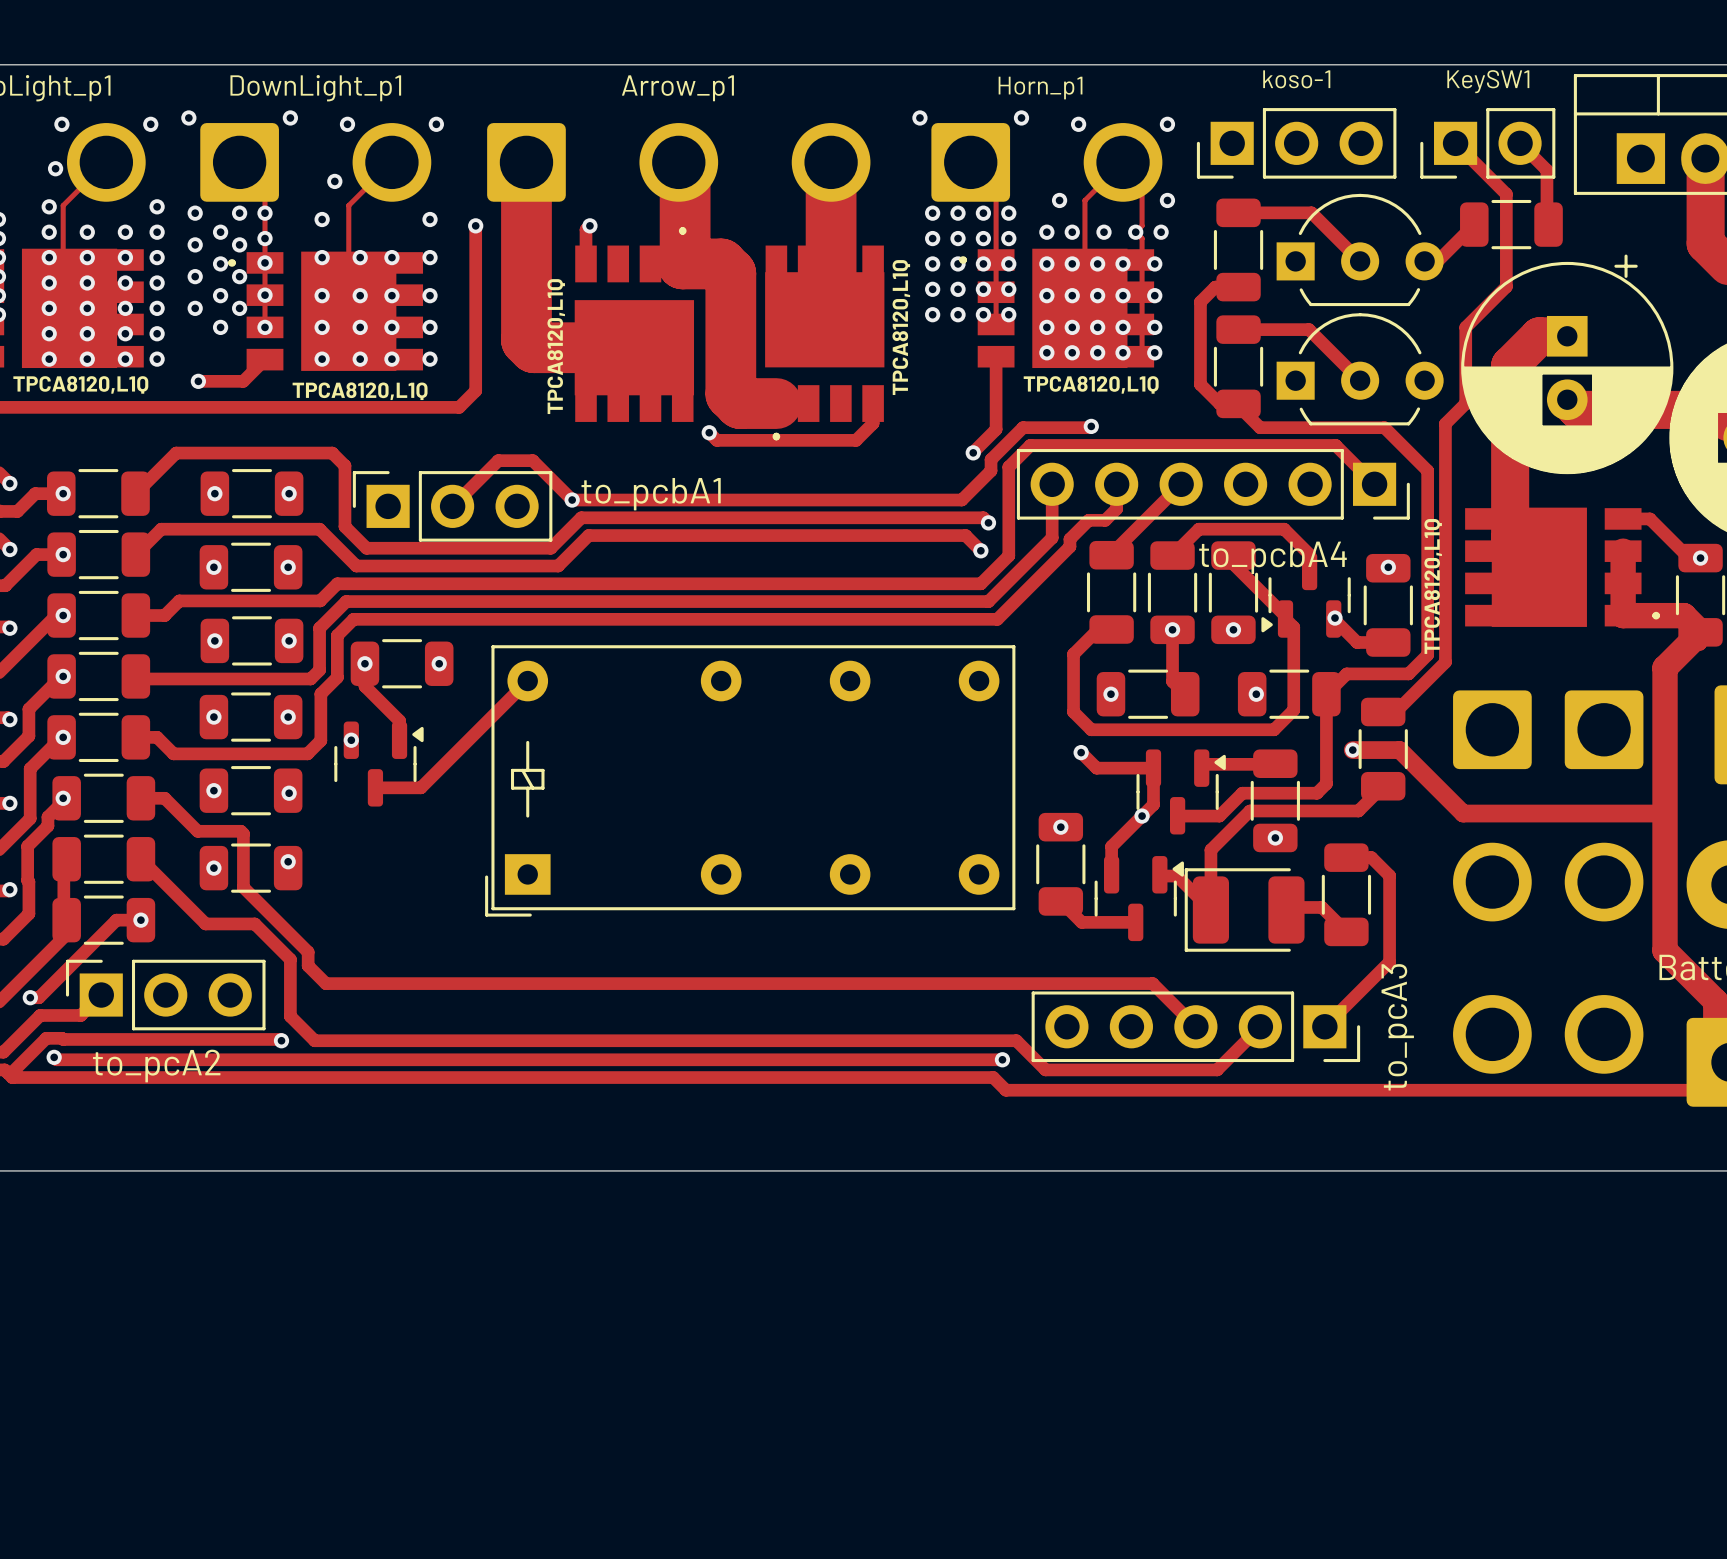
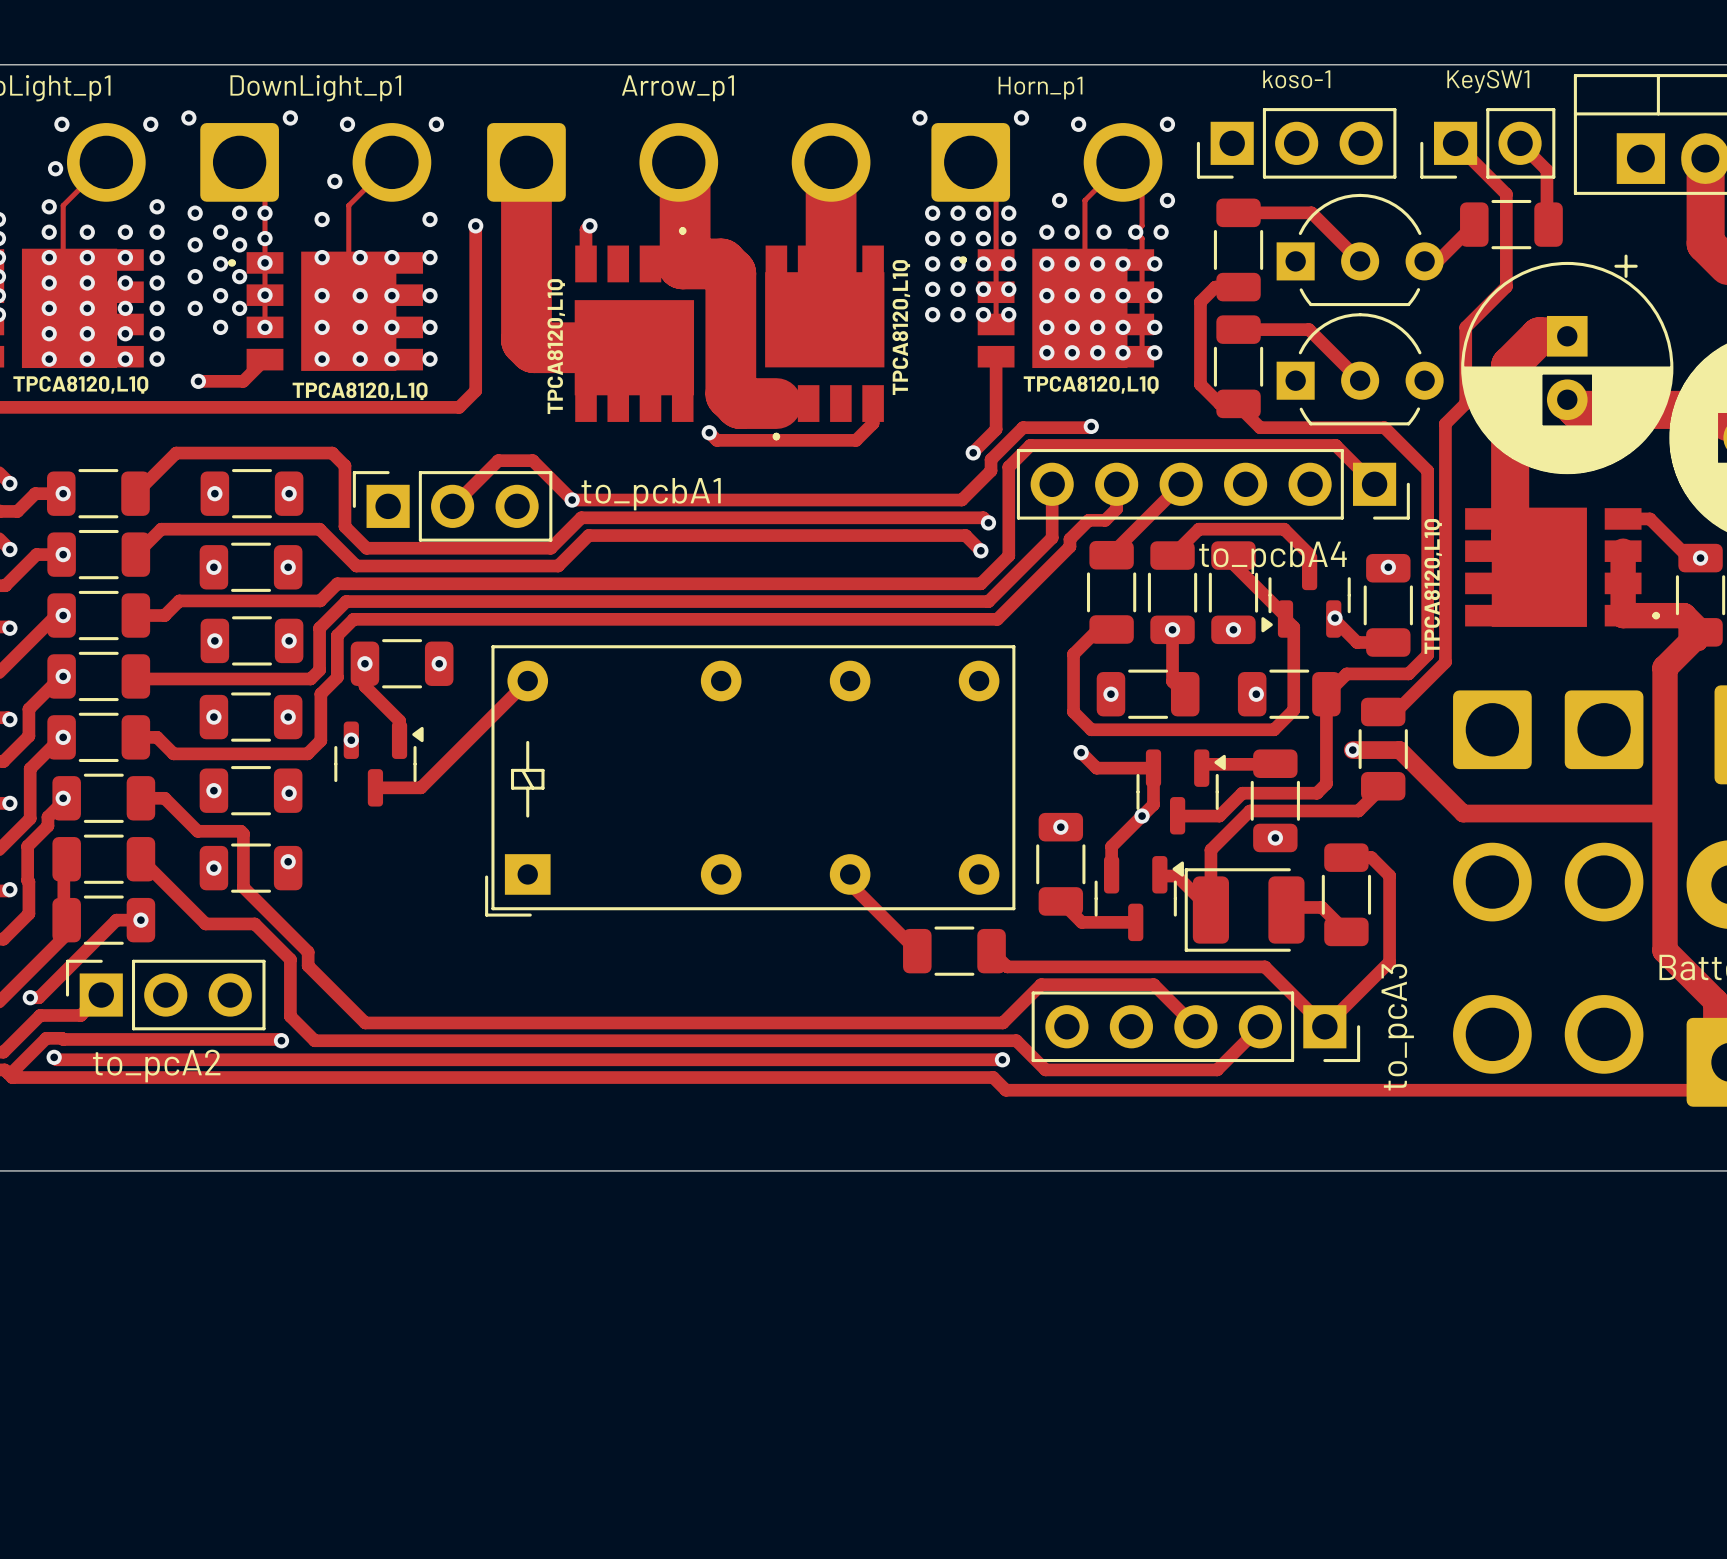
track: none -> (850, 874) (850, 883) (917, 951)
part: none -> (954, 951)
track: none -> (991, 951) (1007, 966) (1264, 966) (1324, 1026)
track: (325, 983) (1153, 984) -> (325, 983) (365, 1022) (1002, 1022) (1041, 984) (1153, 984)

